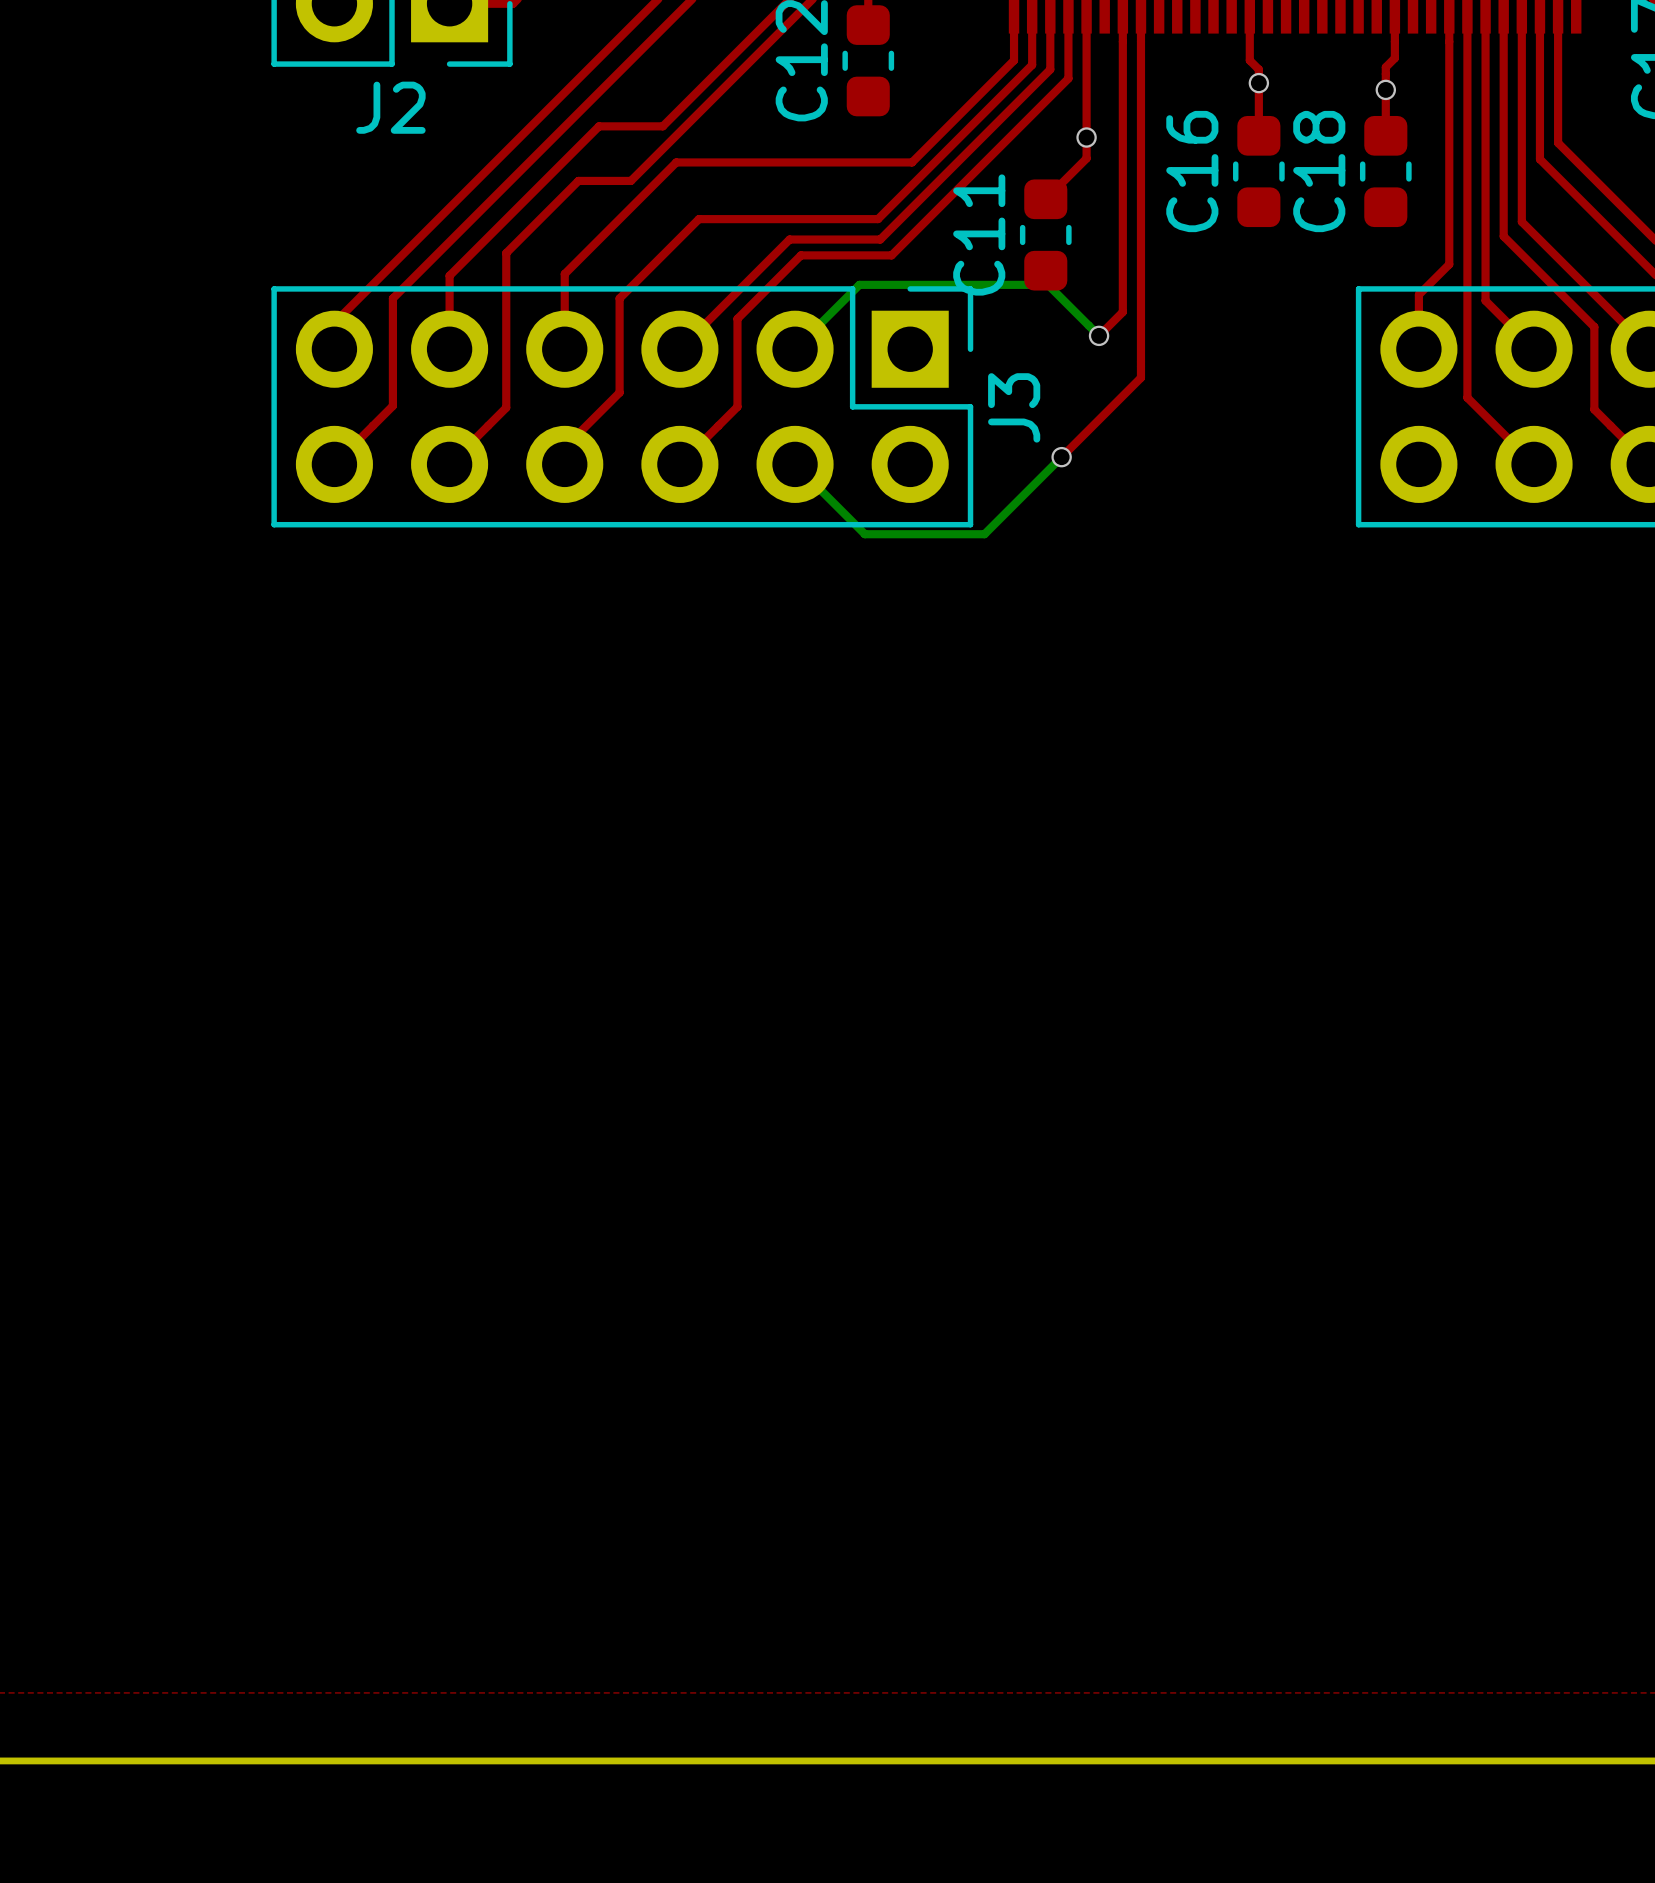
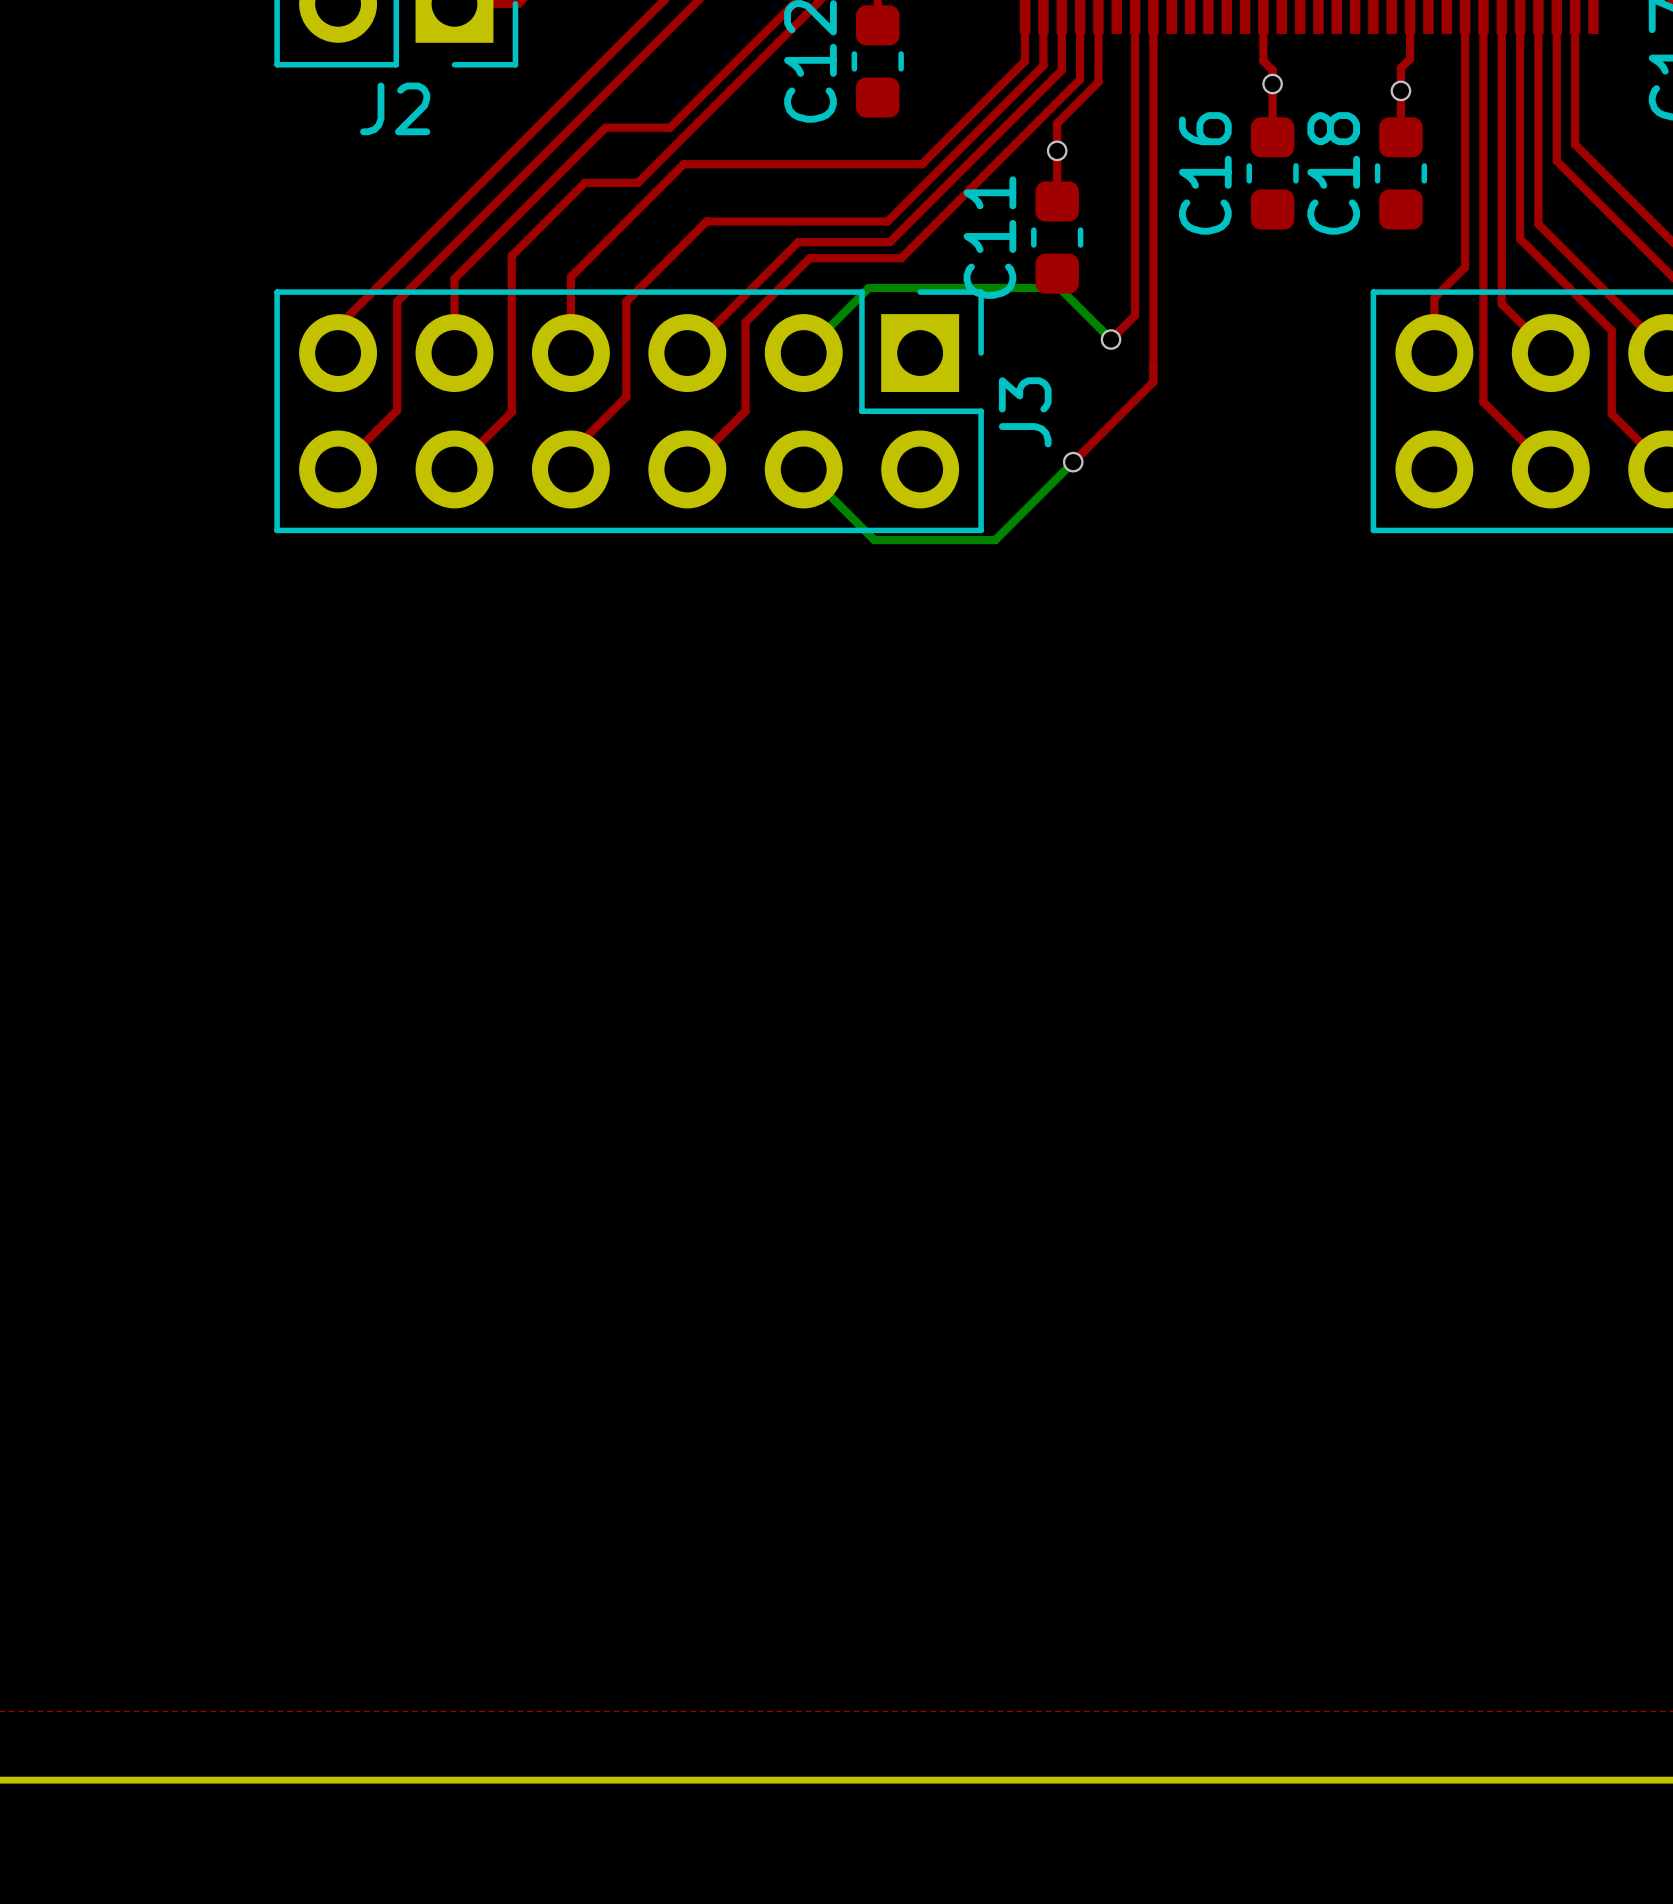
top track: (1086, 81) (1086, 158) (1045, 199) -> (1098, 82) (1057, 123) (1057, 201)
via position: (1086, 137) -> (1057, 150)

